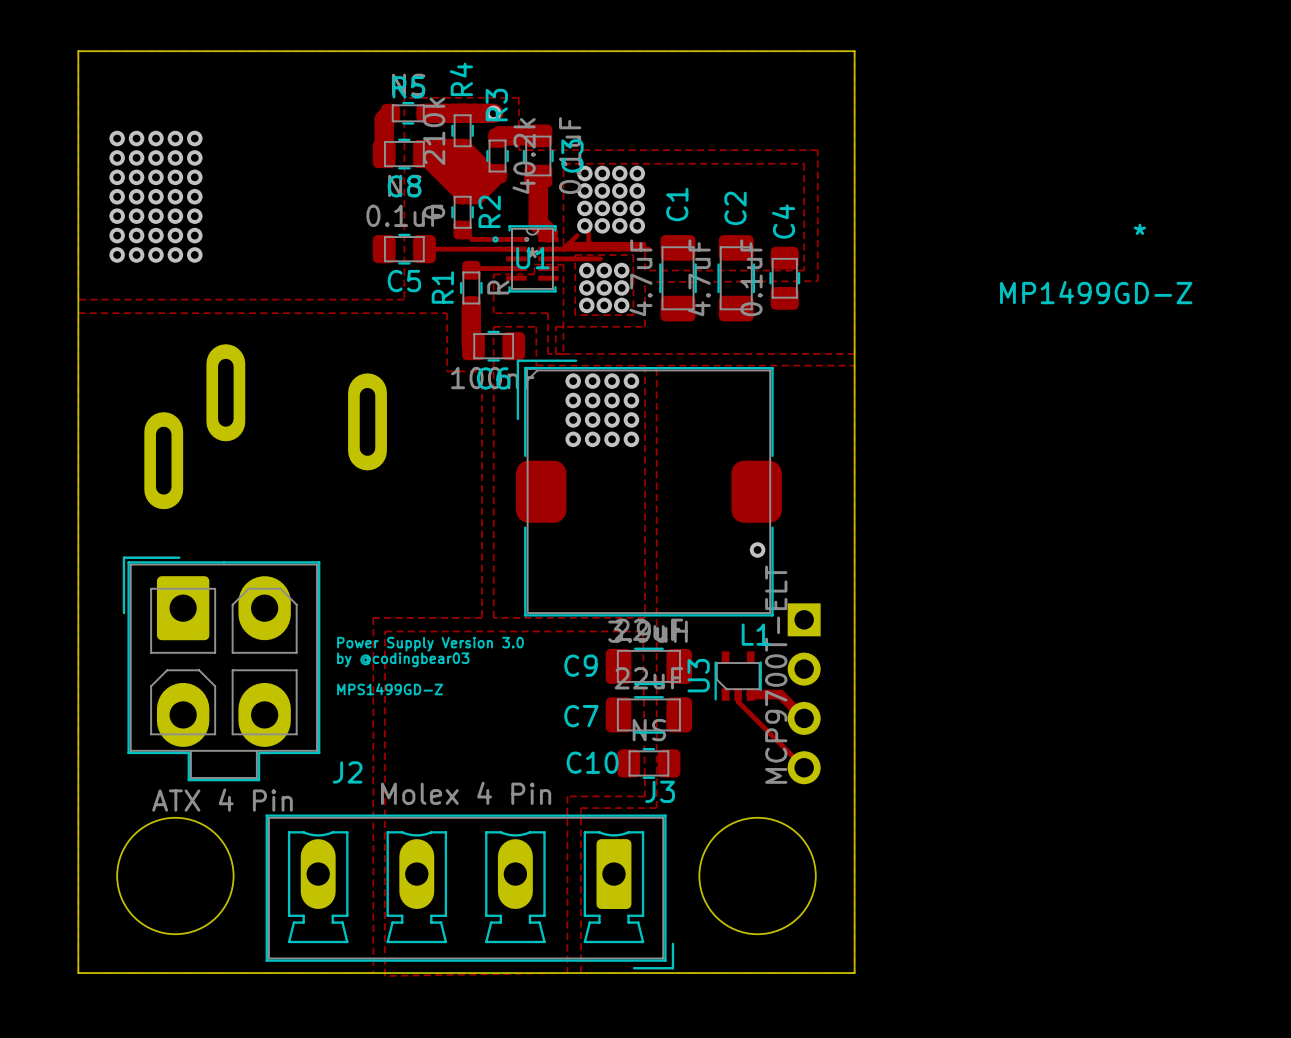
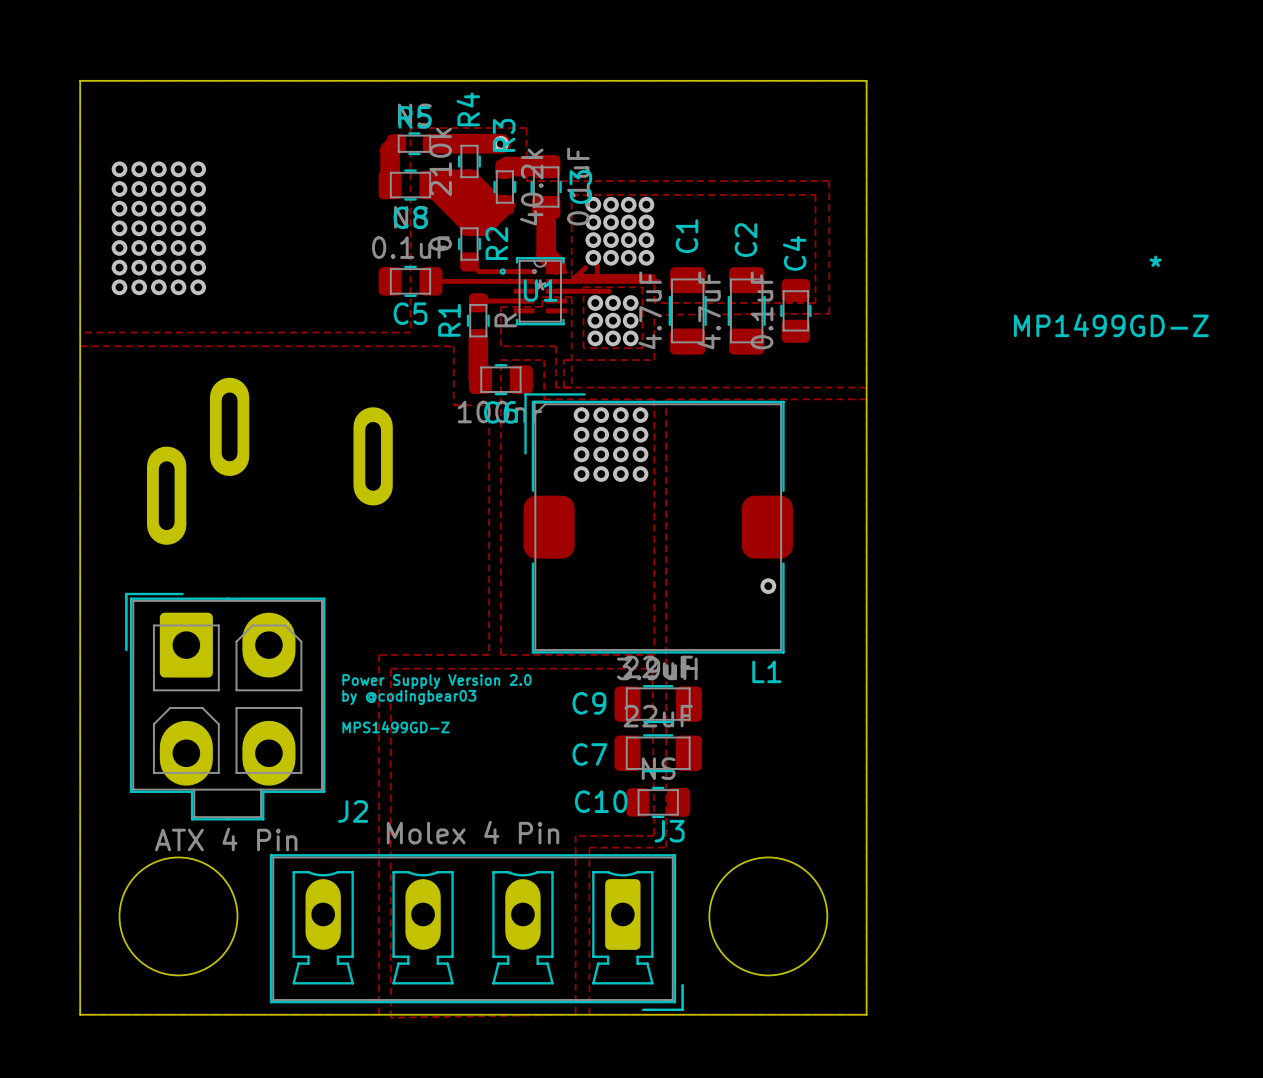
text: Power Supply Version 3.0 (430, 644) -> Power Supply Version 2.0 (436, 681)
U3: MCP9700T-ELT (738, 676) -> none
part: (804, 693) -> none
track: (738, 694) (738, 701) (804, 767) -> none
track: (750, 694) (780, 694) (804, 718) -> none

